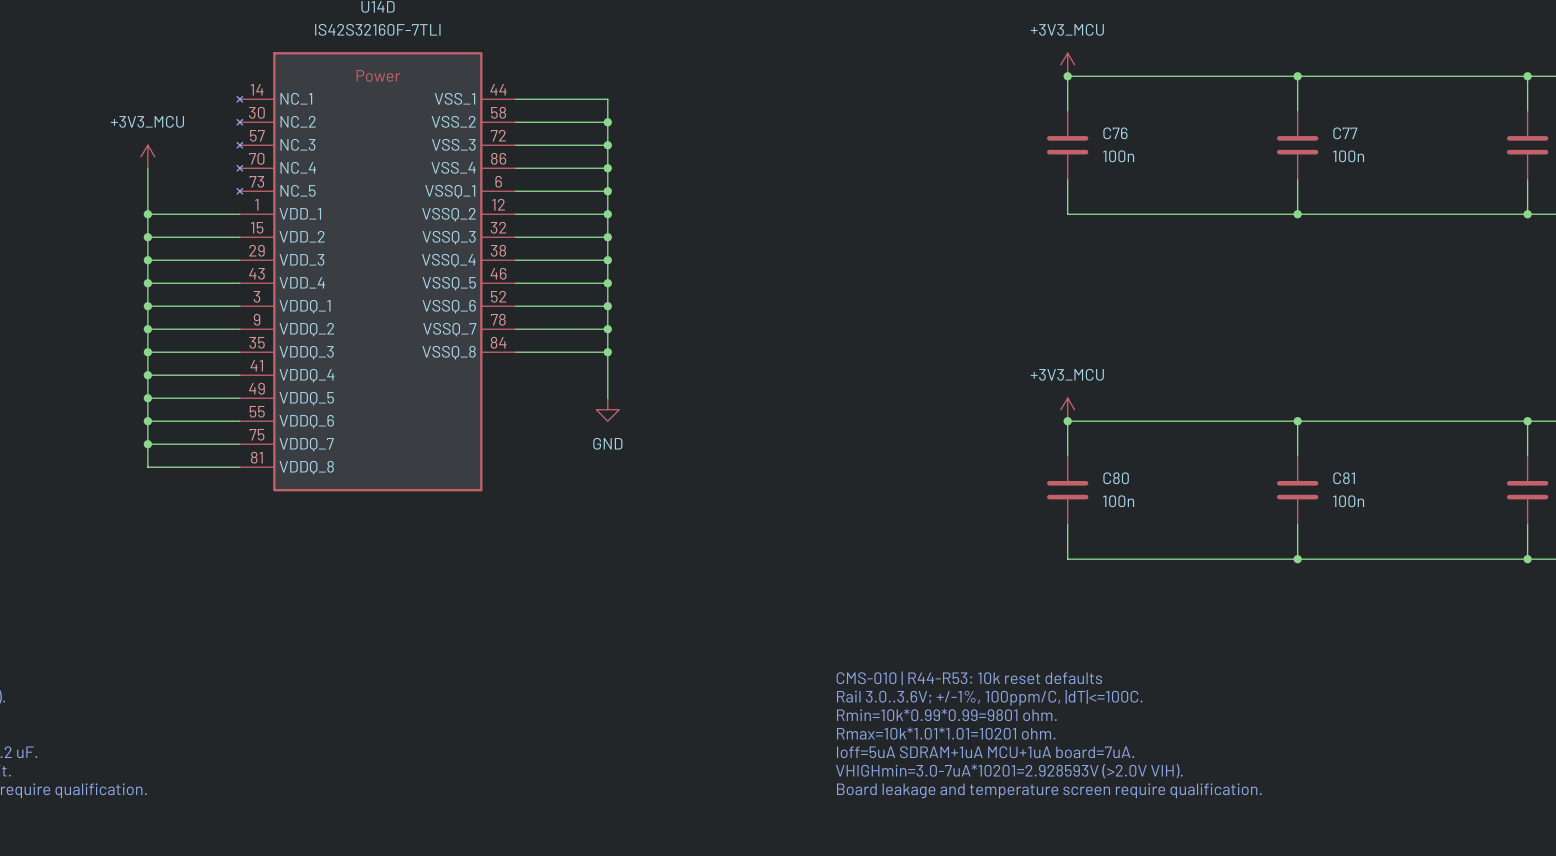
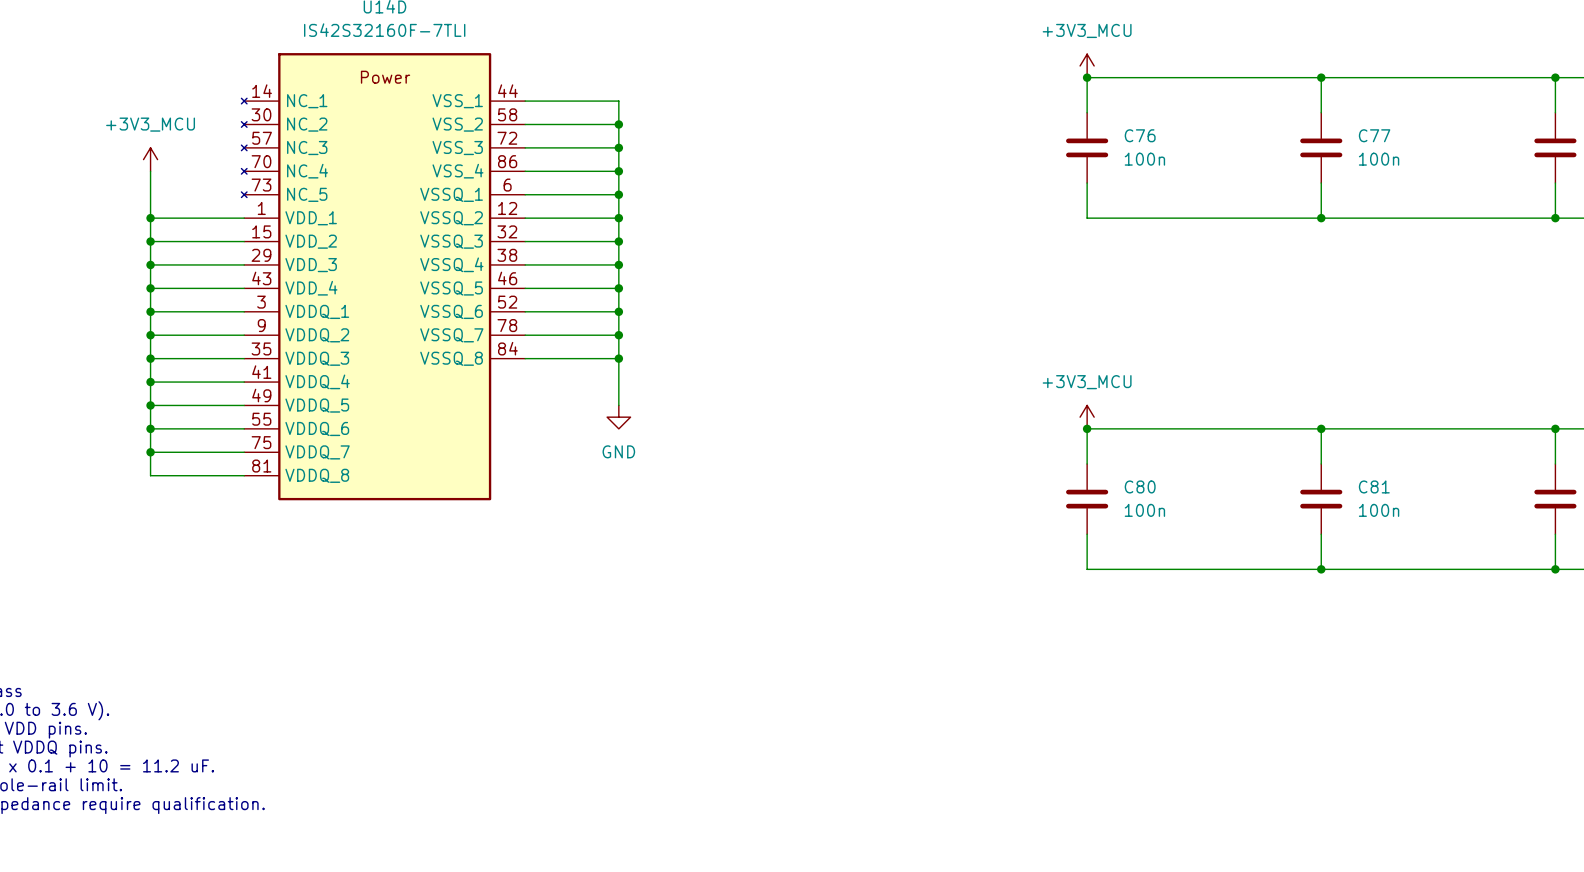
text: CMS-010 | R44-R53: 10k reset defaults (969, 678) -> none
text: Rail 3.0..3.6V; +/-1%, 100ppm/C, |dT|<=100C. (989, 697) -> none
text: Rmin=10k*0.99*0.99=9801 ohm. (946, 714) -> none
text: Rmax=10k*1.01*1.01=10201 ohm. (946, 733) -> none
text: Ioff=5uA SDRAM+1uA MCU+1uA board=7uA. (985, 752) -> none
text: VHIGHmin=3.0-7uA*10201=2.928593V (>2.0V VIH). (1009, 771) -> none
text: Board leakage and temperature screen require qualification. (1049, 790) -> none

